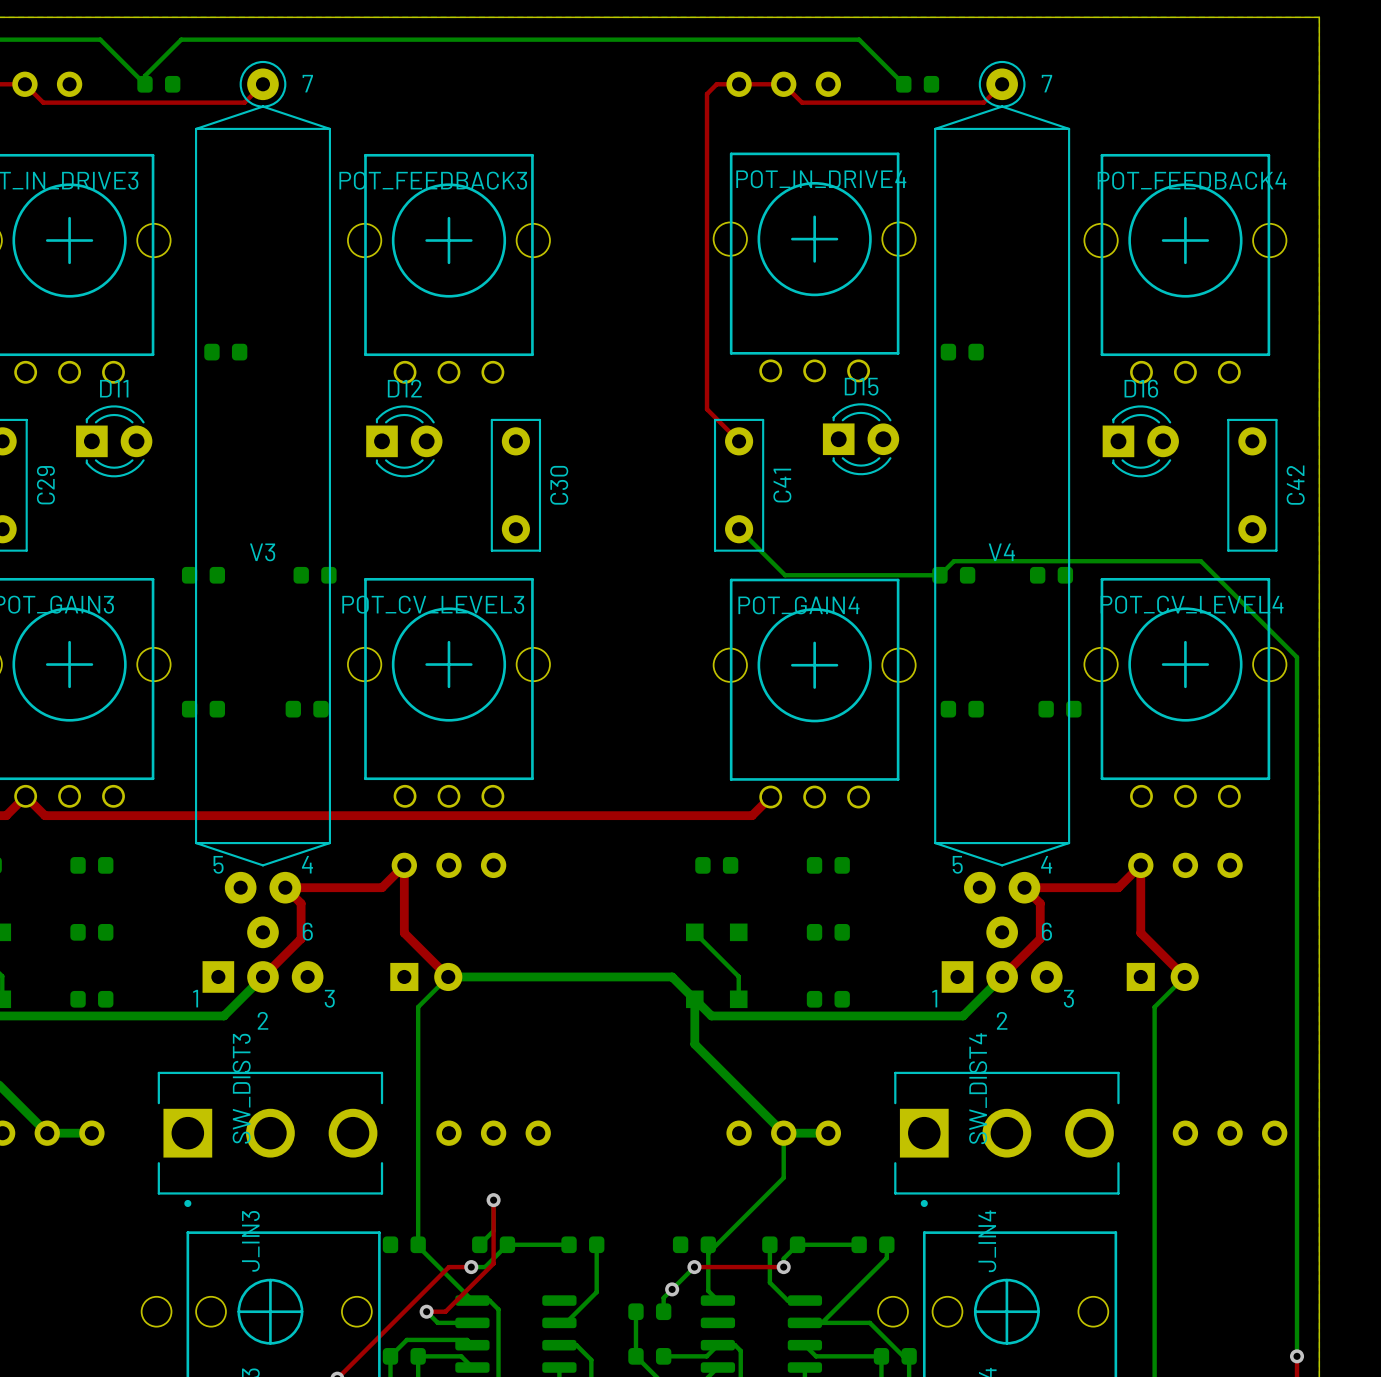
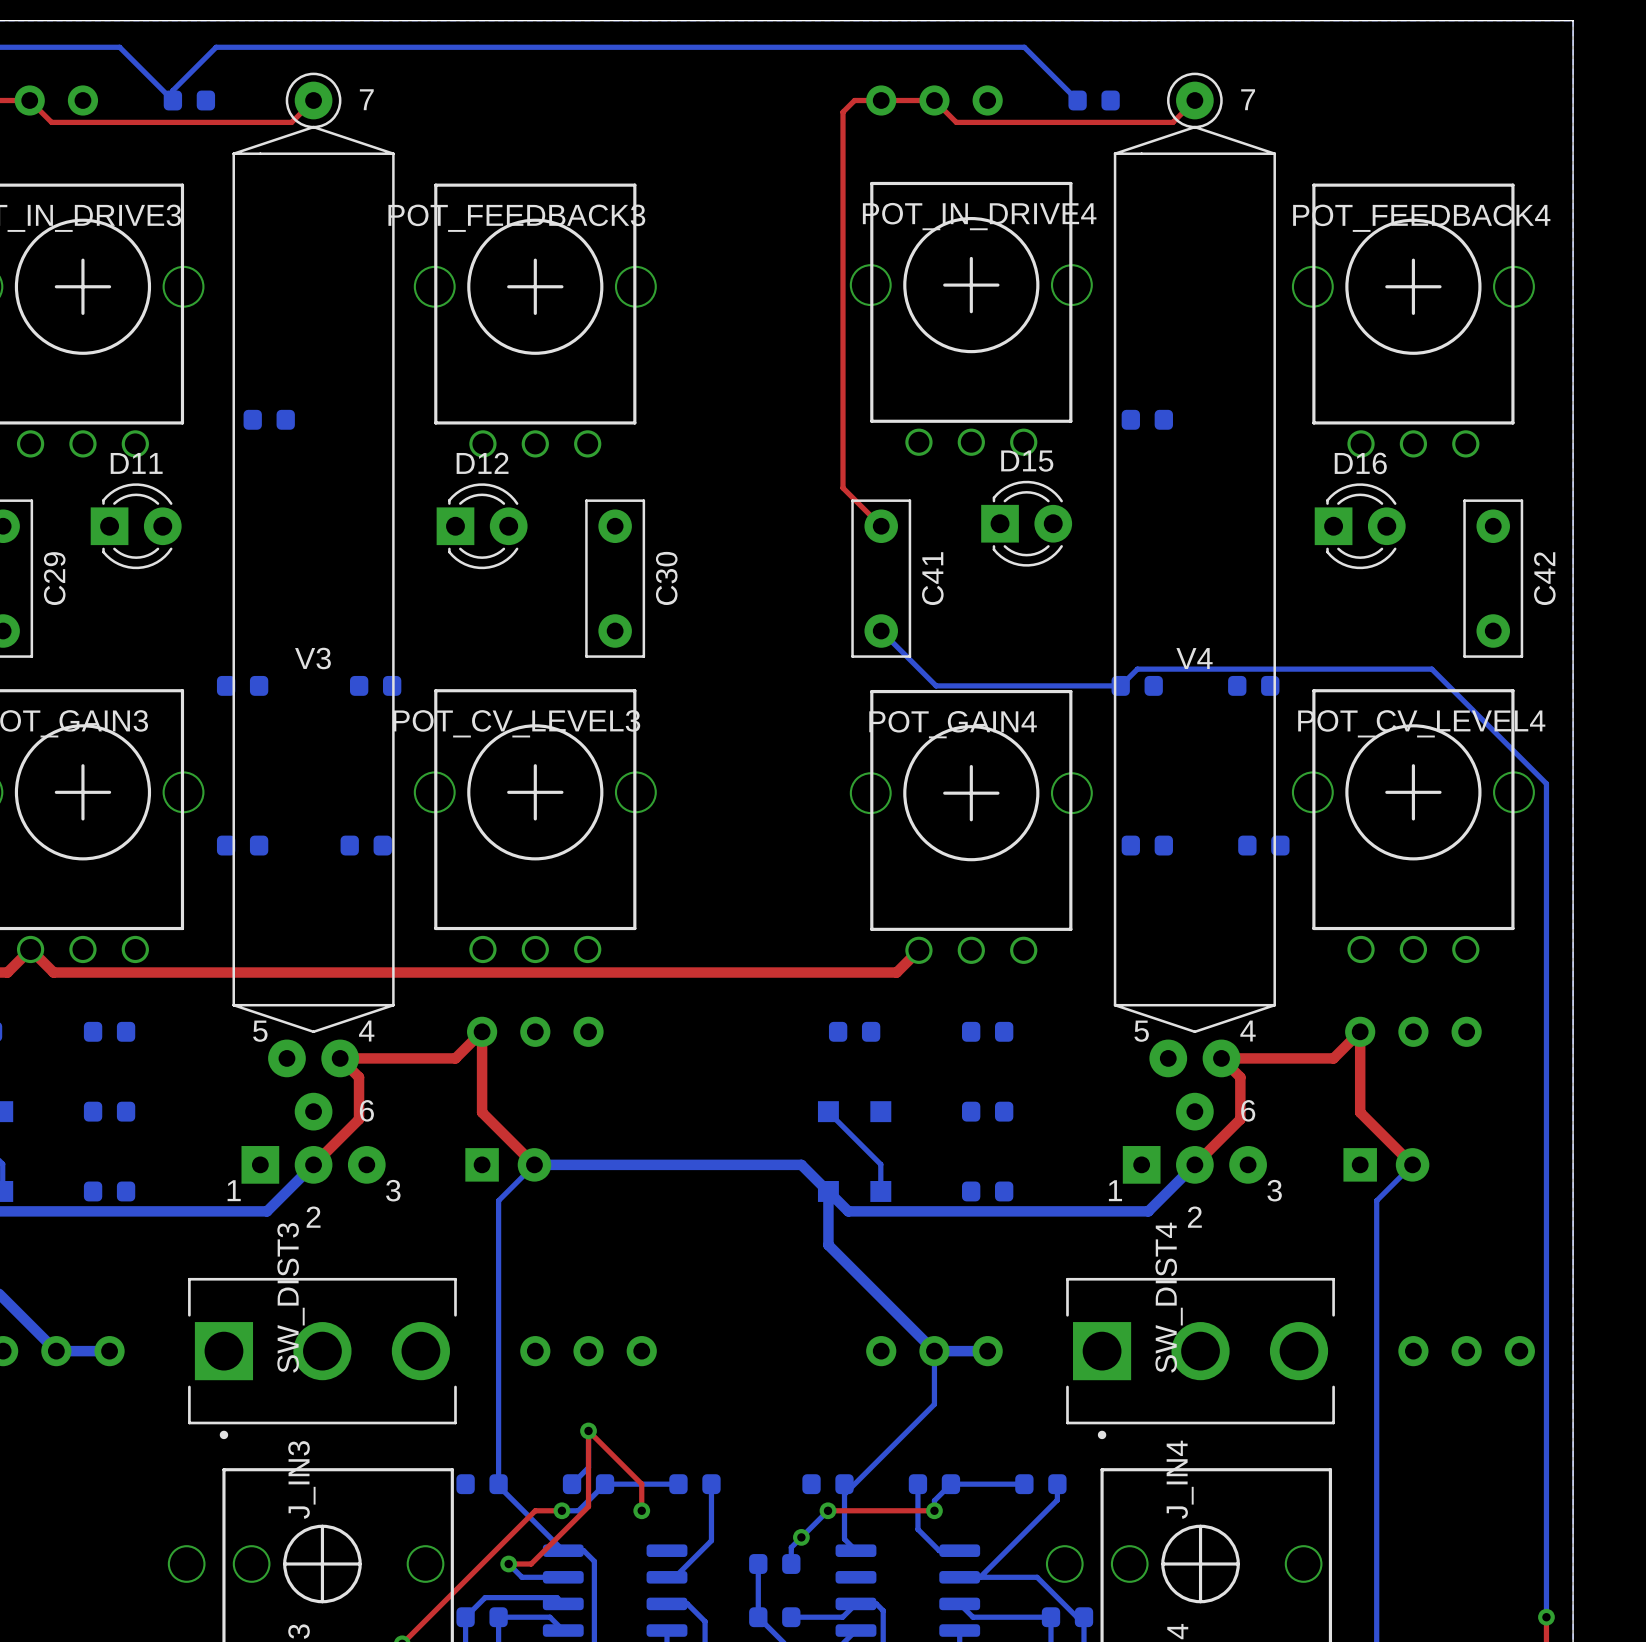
top track: none -> (588, 1430) (641, 1484) (641, 1510)
via: none -> (641, 1510)

